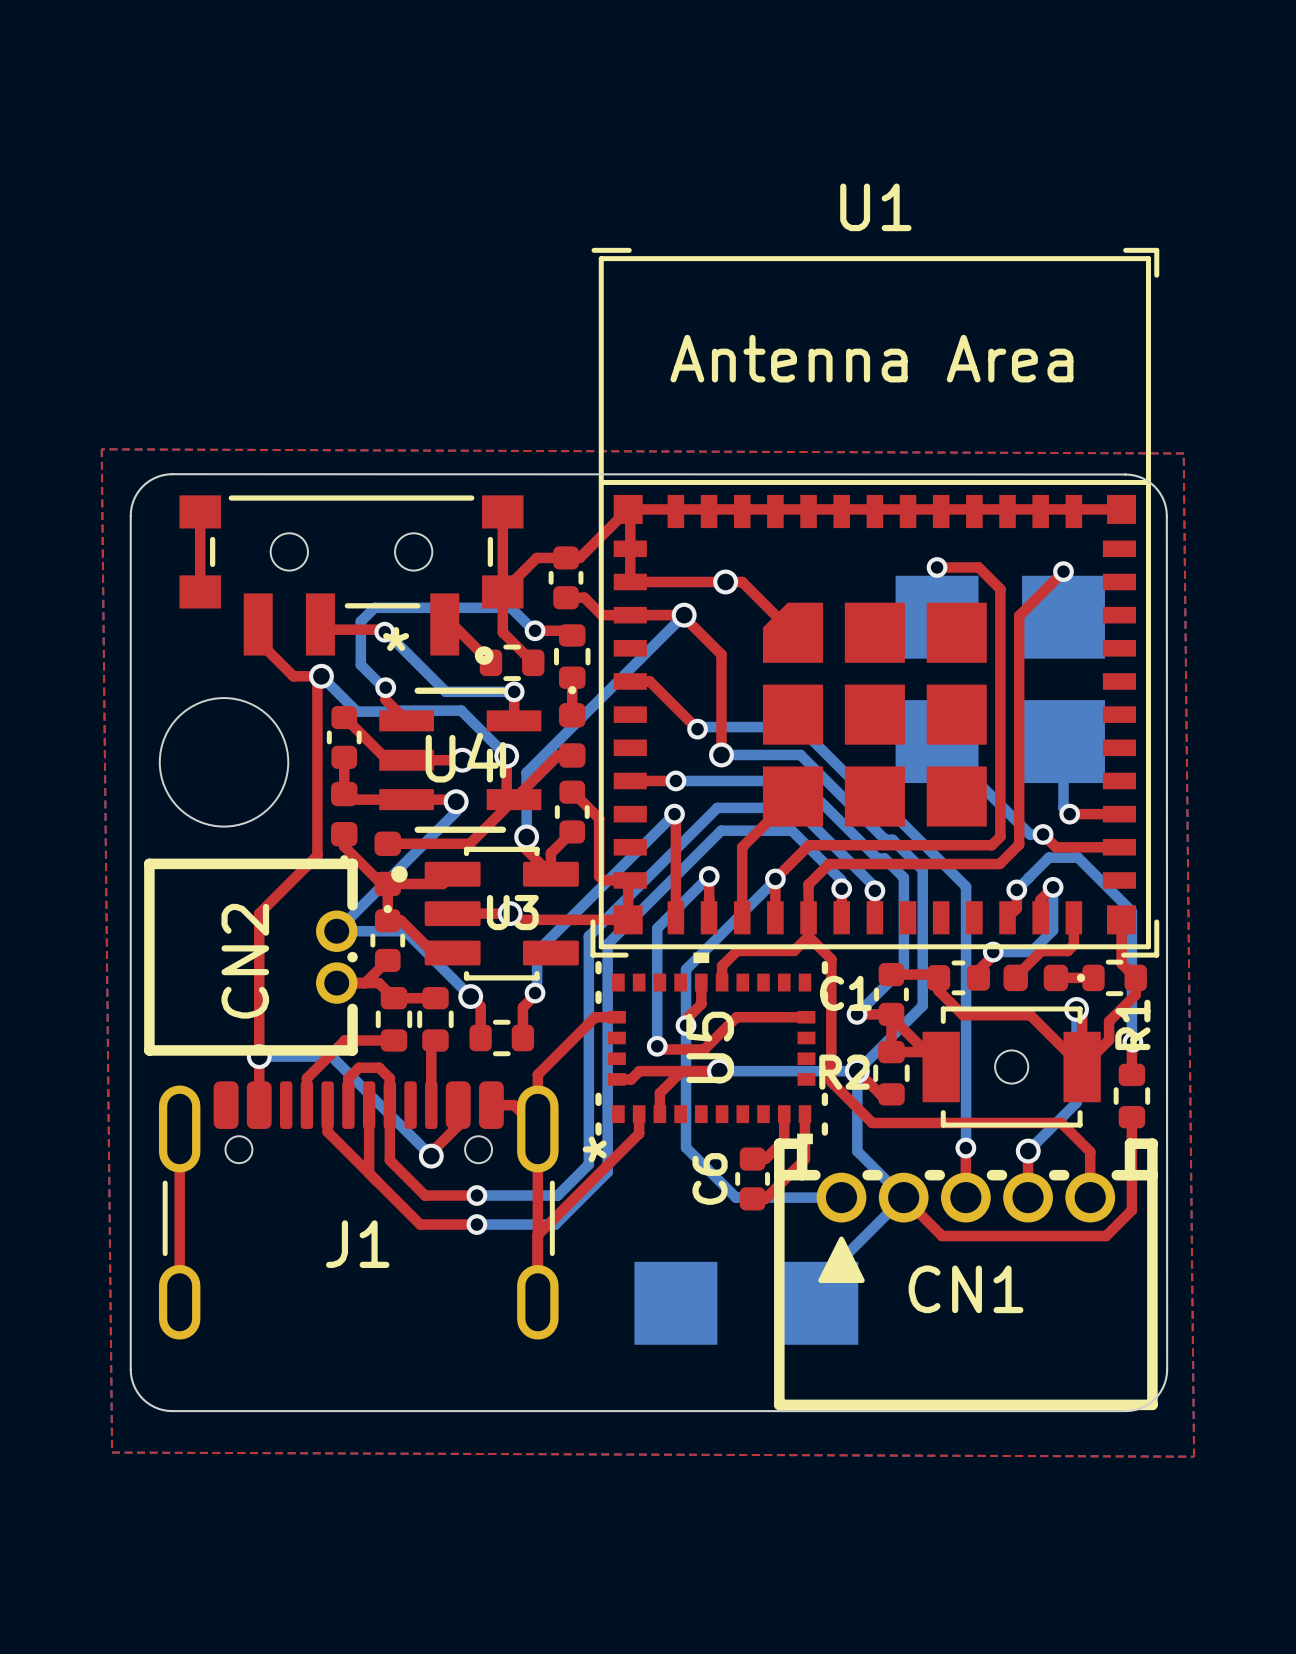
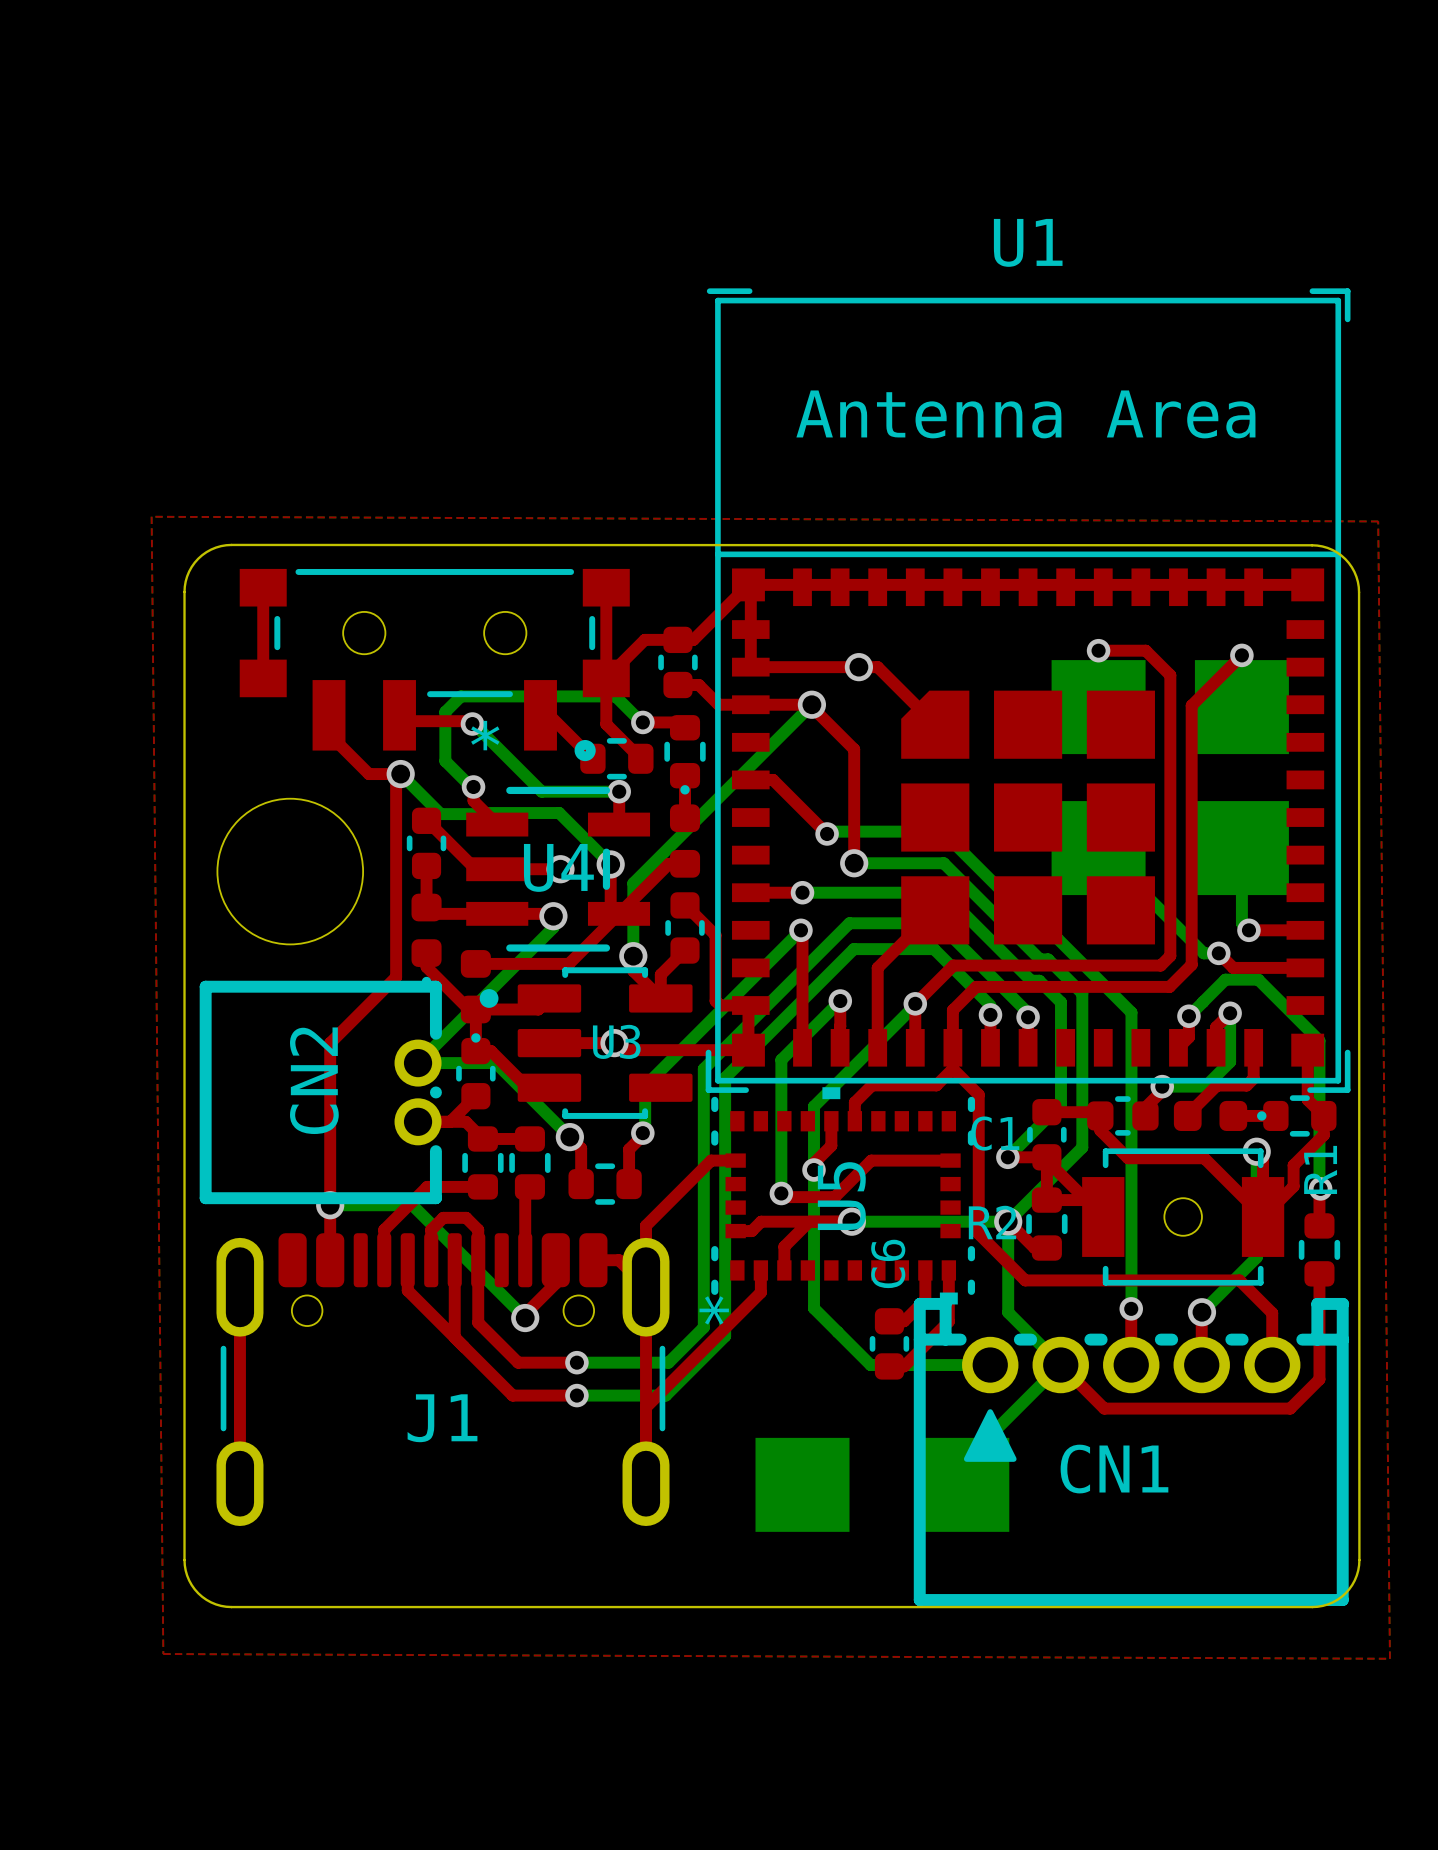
C6 name position: C6 (710, 1178) -> C6 (888, 1263)

